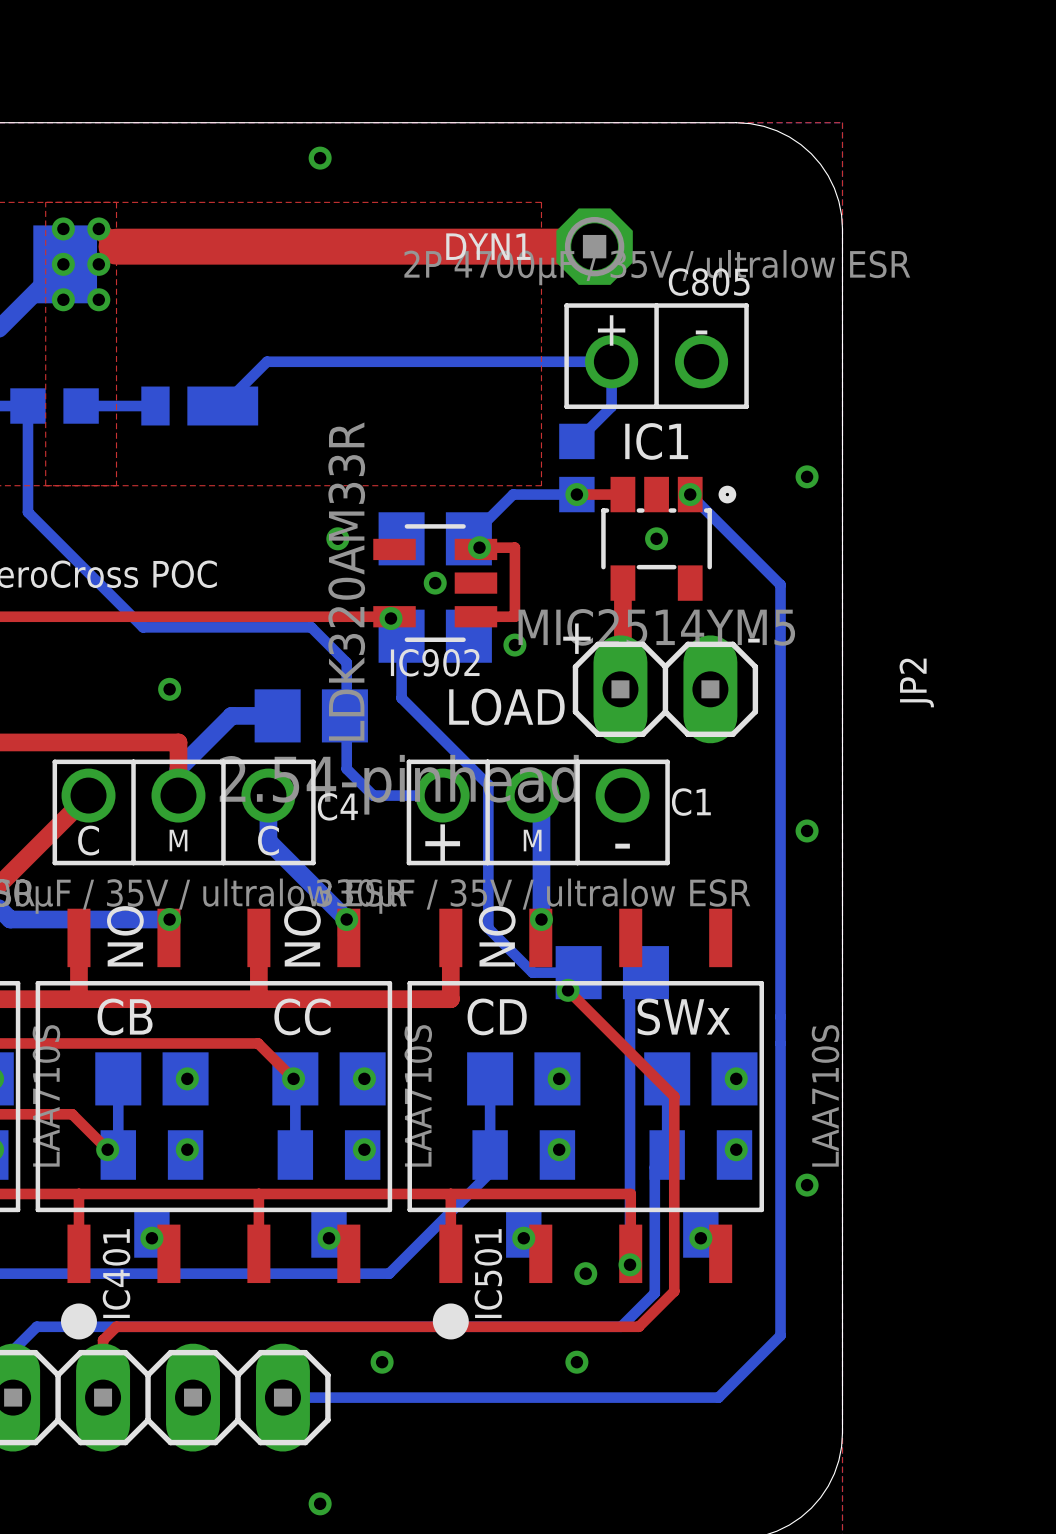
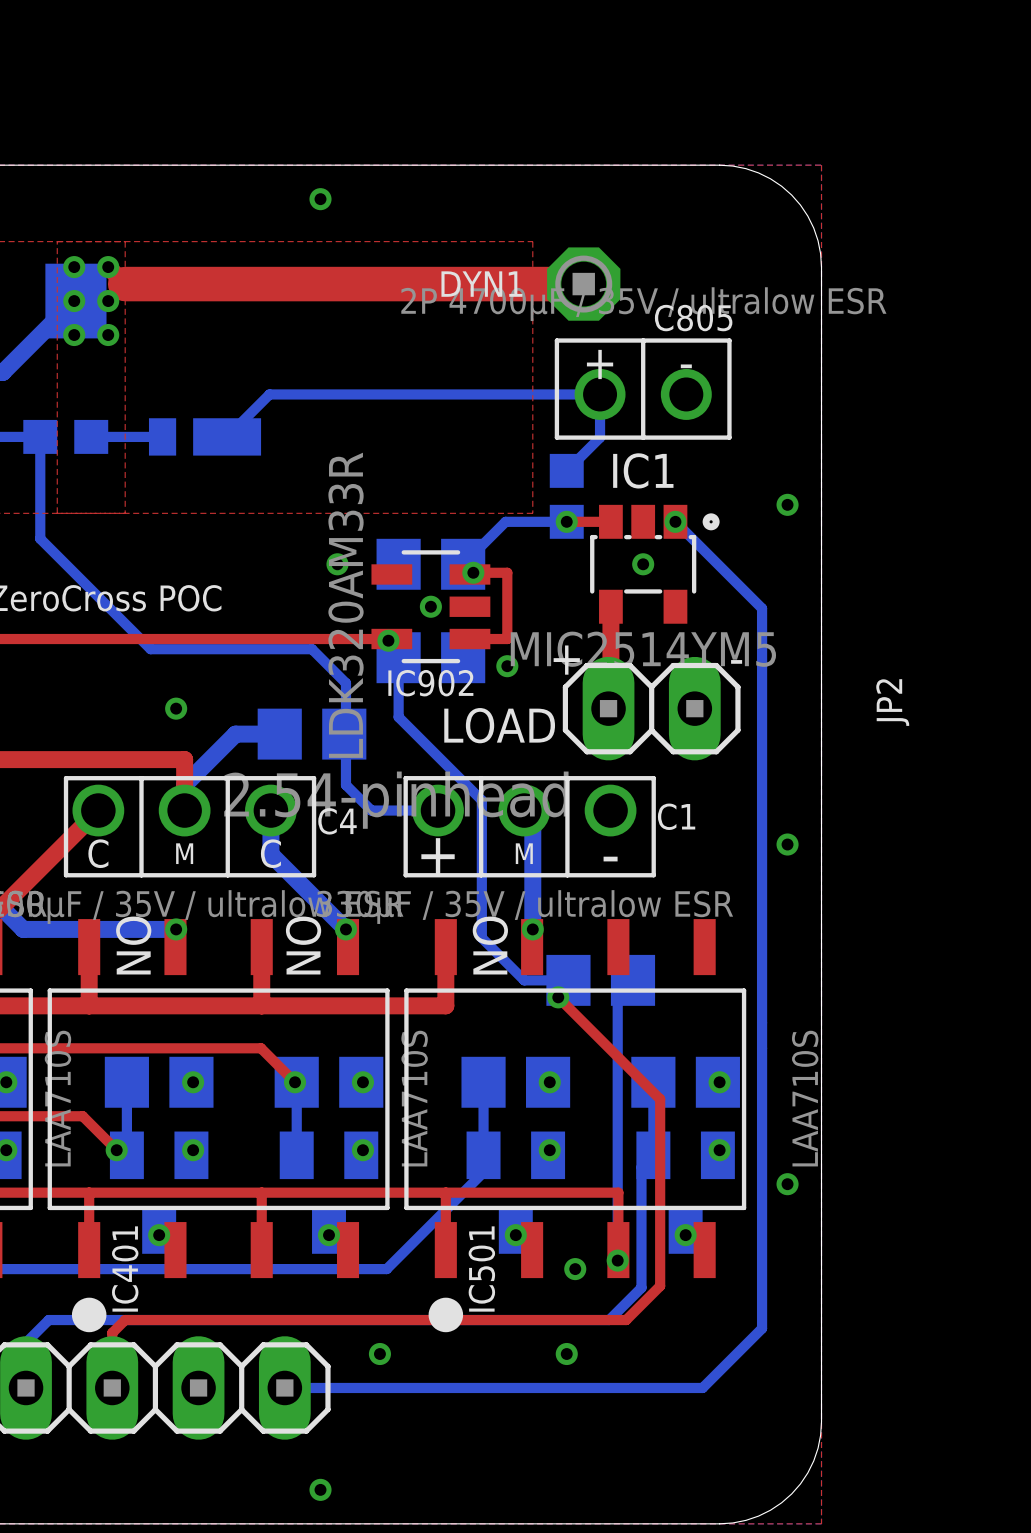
text: CB (125, 1016) -> none
text: CC (302, 1016) -> none
text: CD (497, 1016) -> none
text: SWx (683, 1016) -> none

